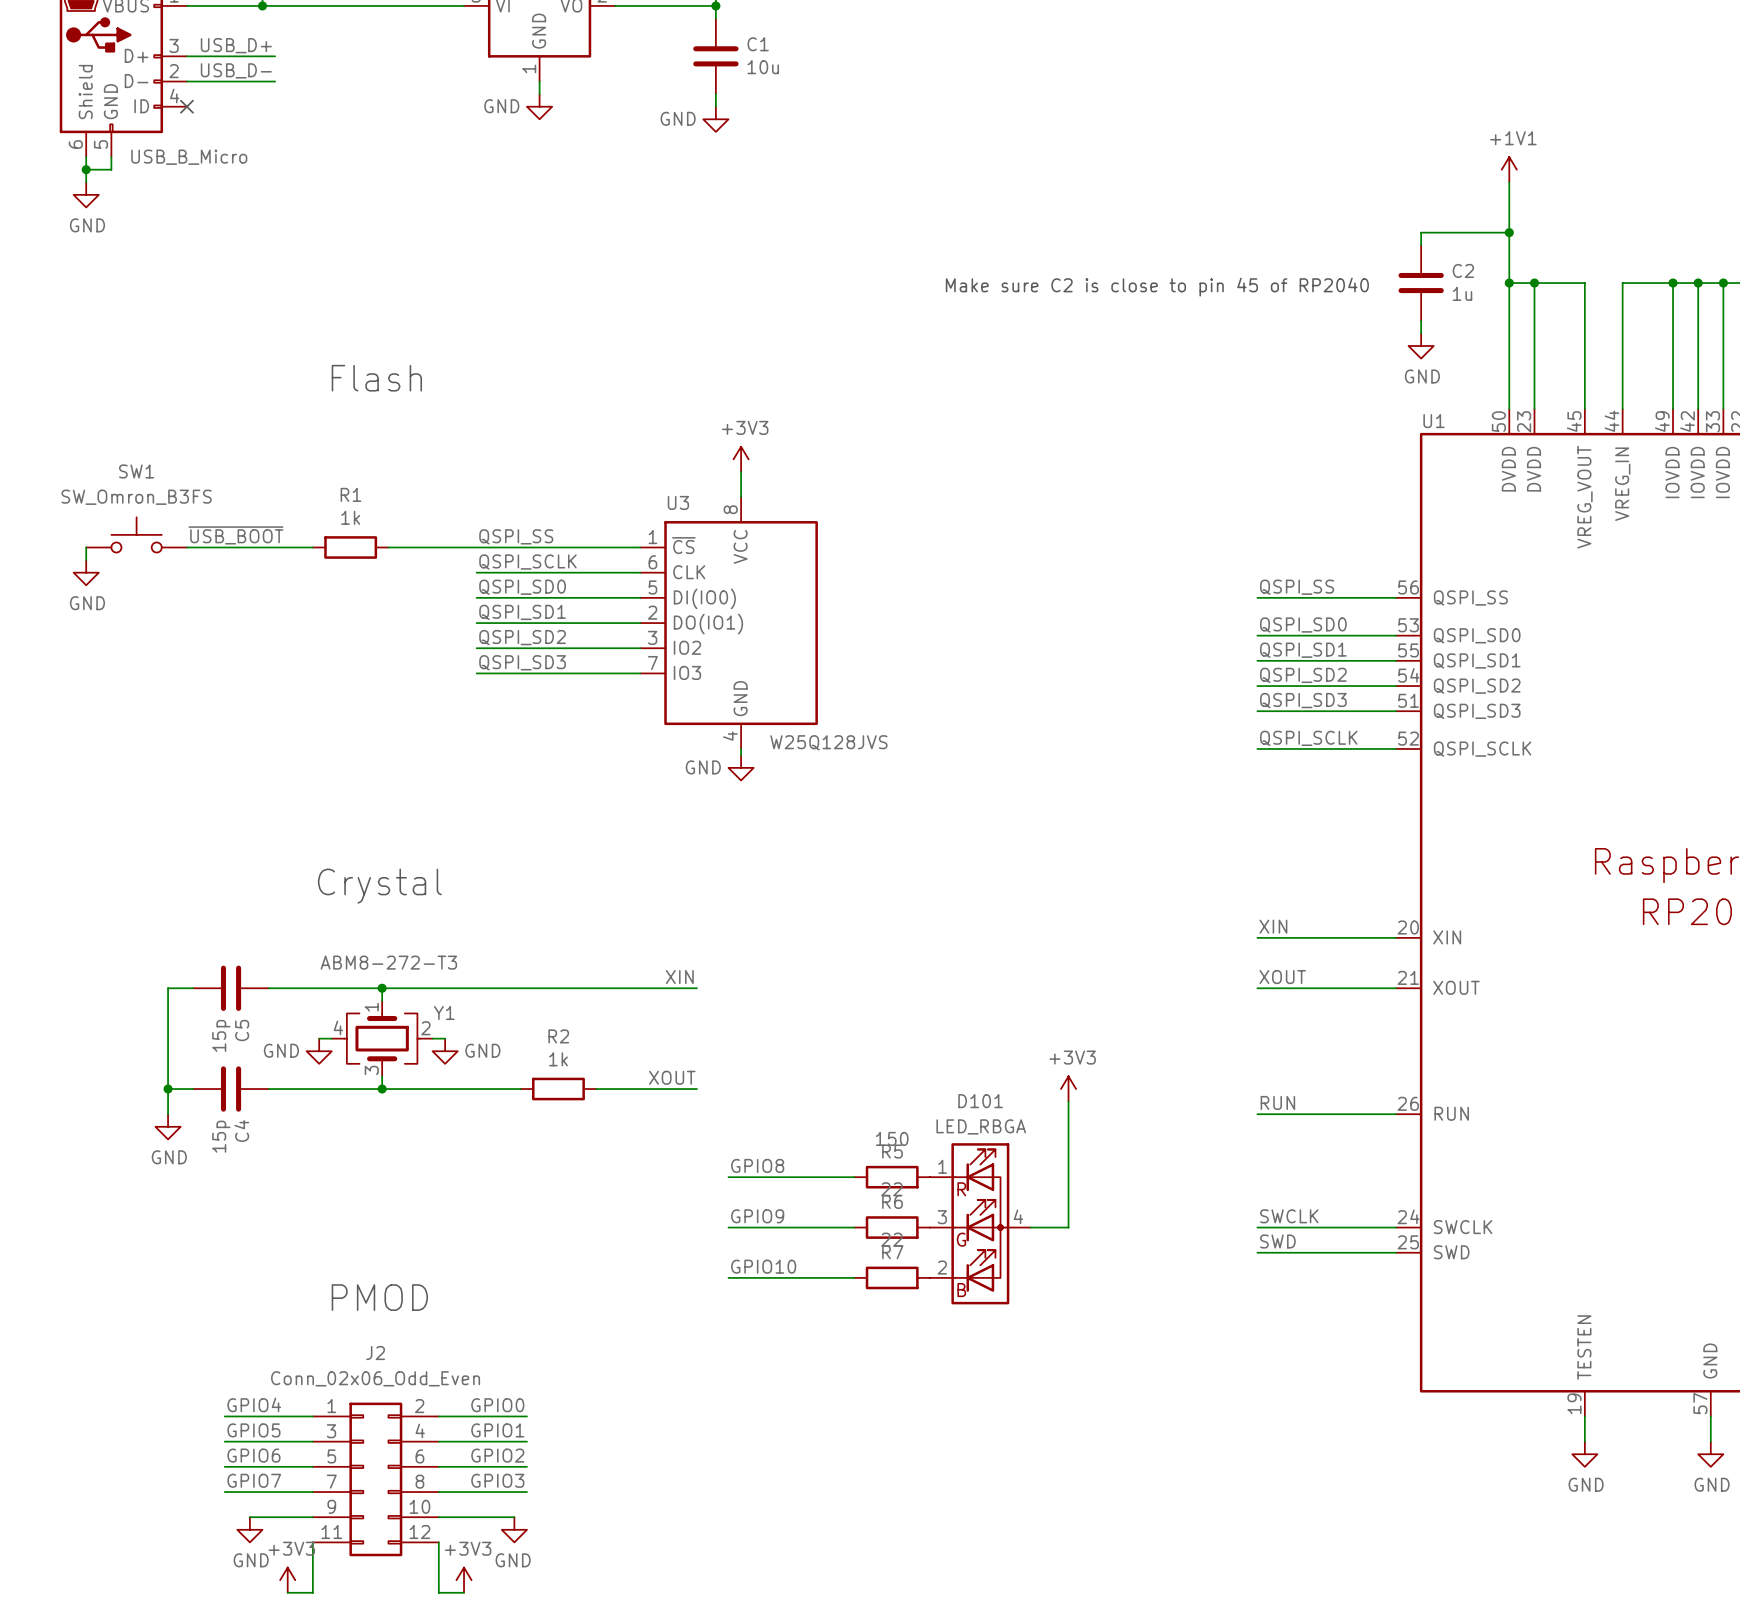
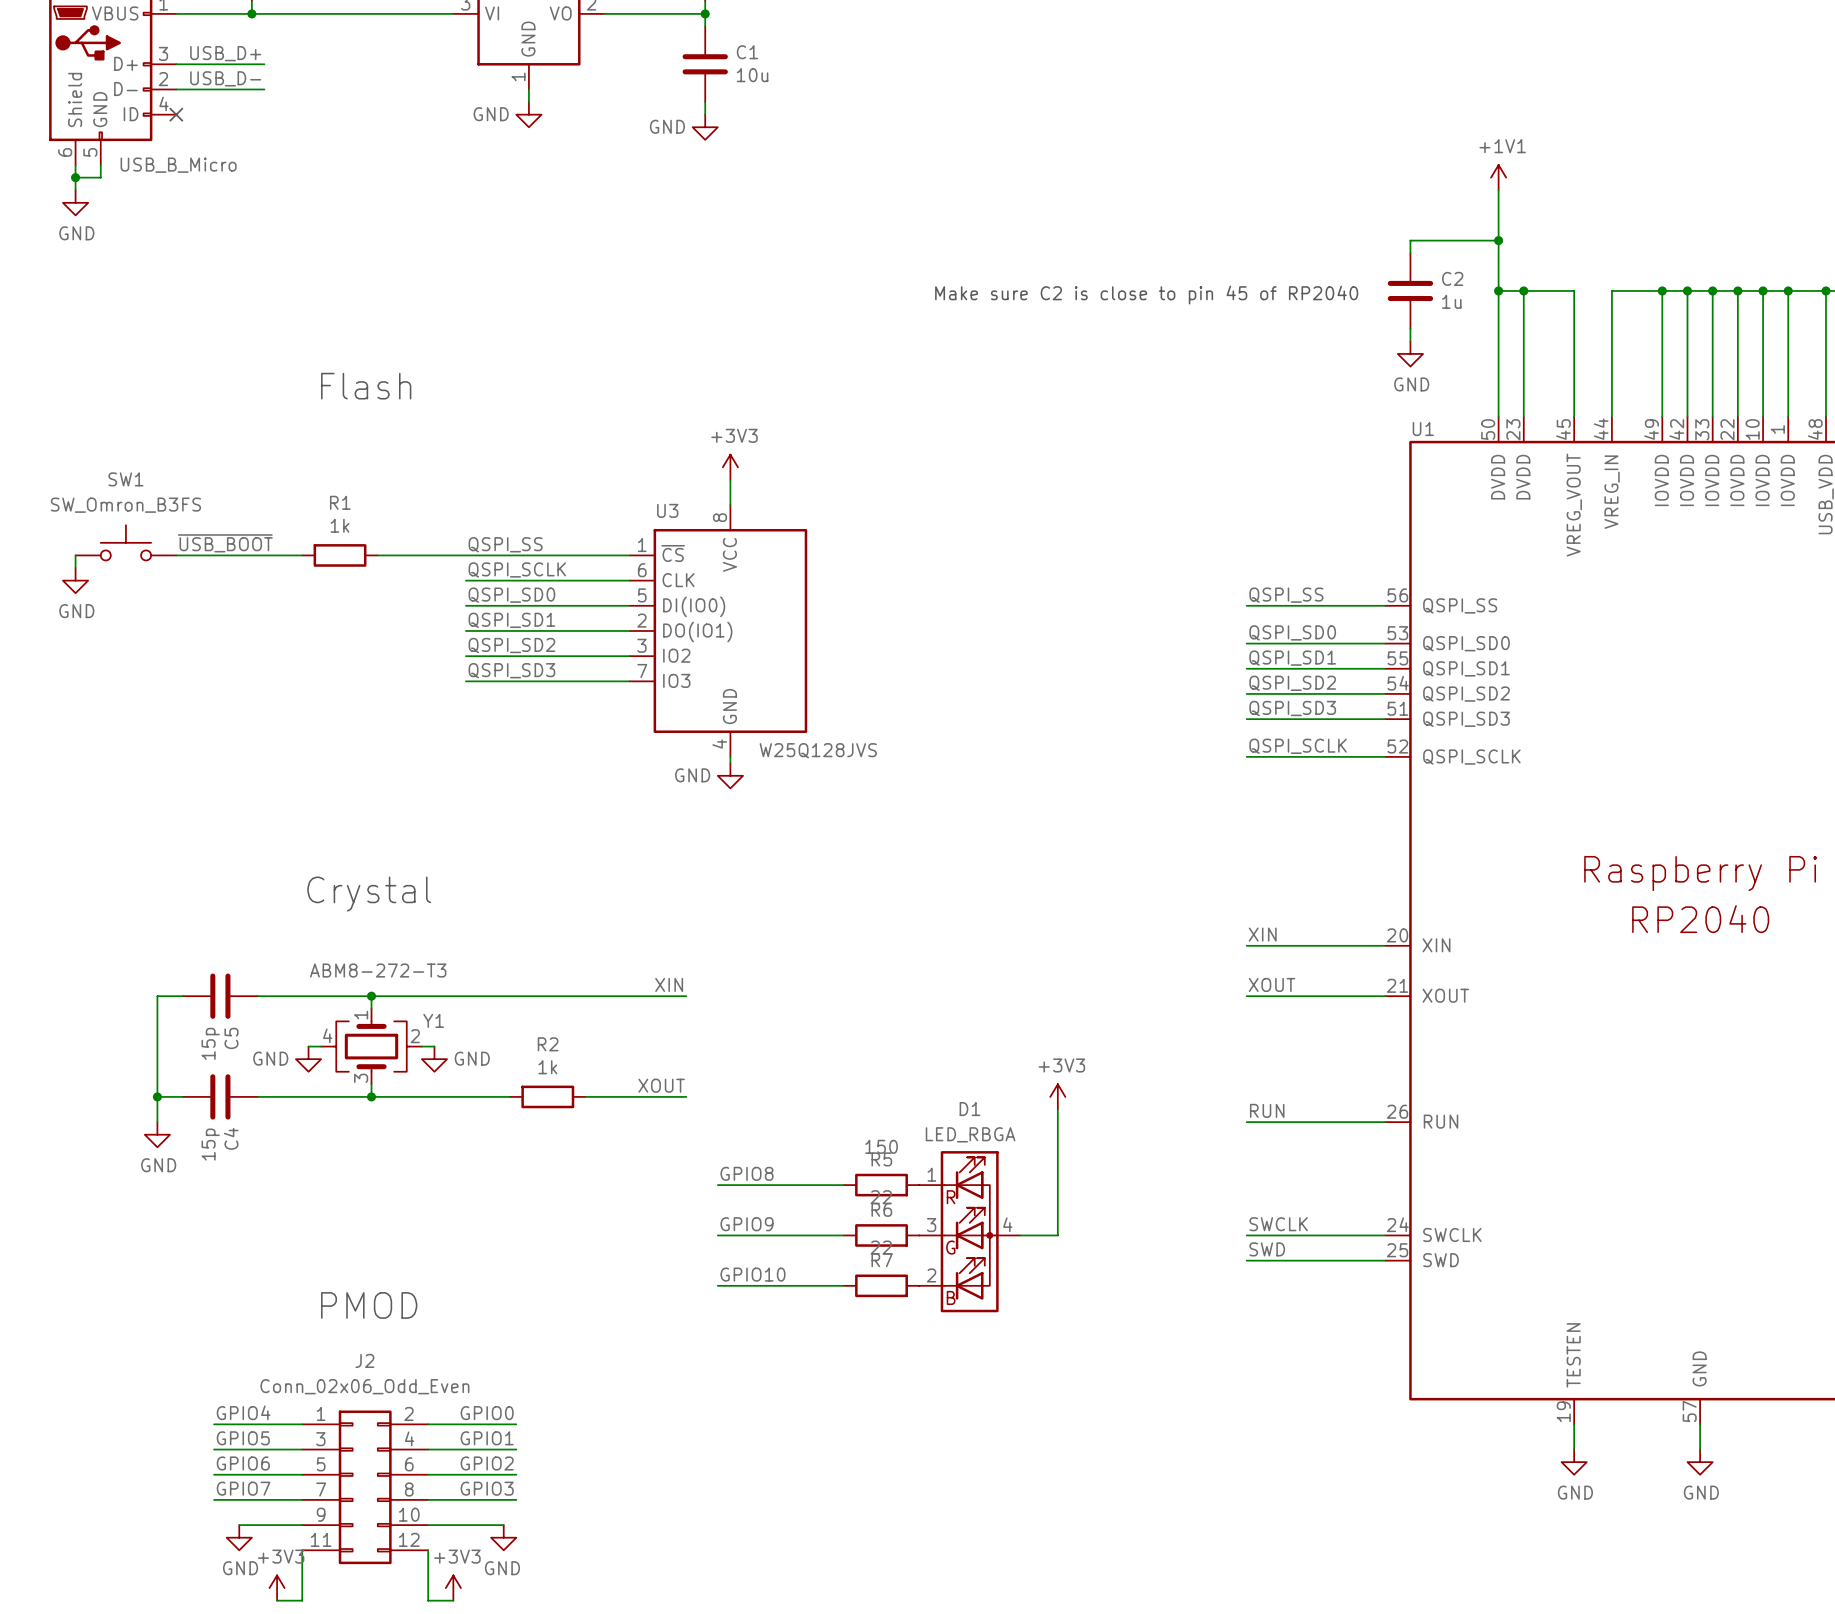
D101 name: D101 (980, 1101) -> D1 (969, 1109)

